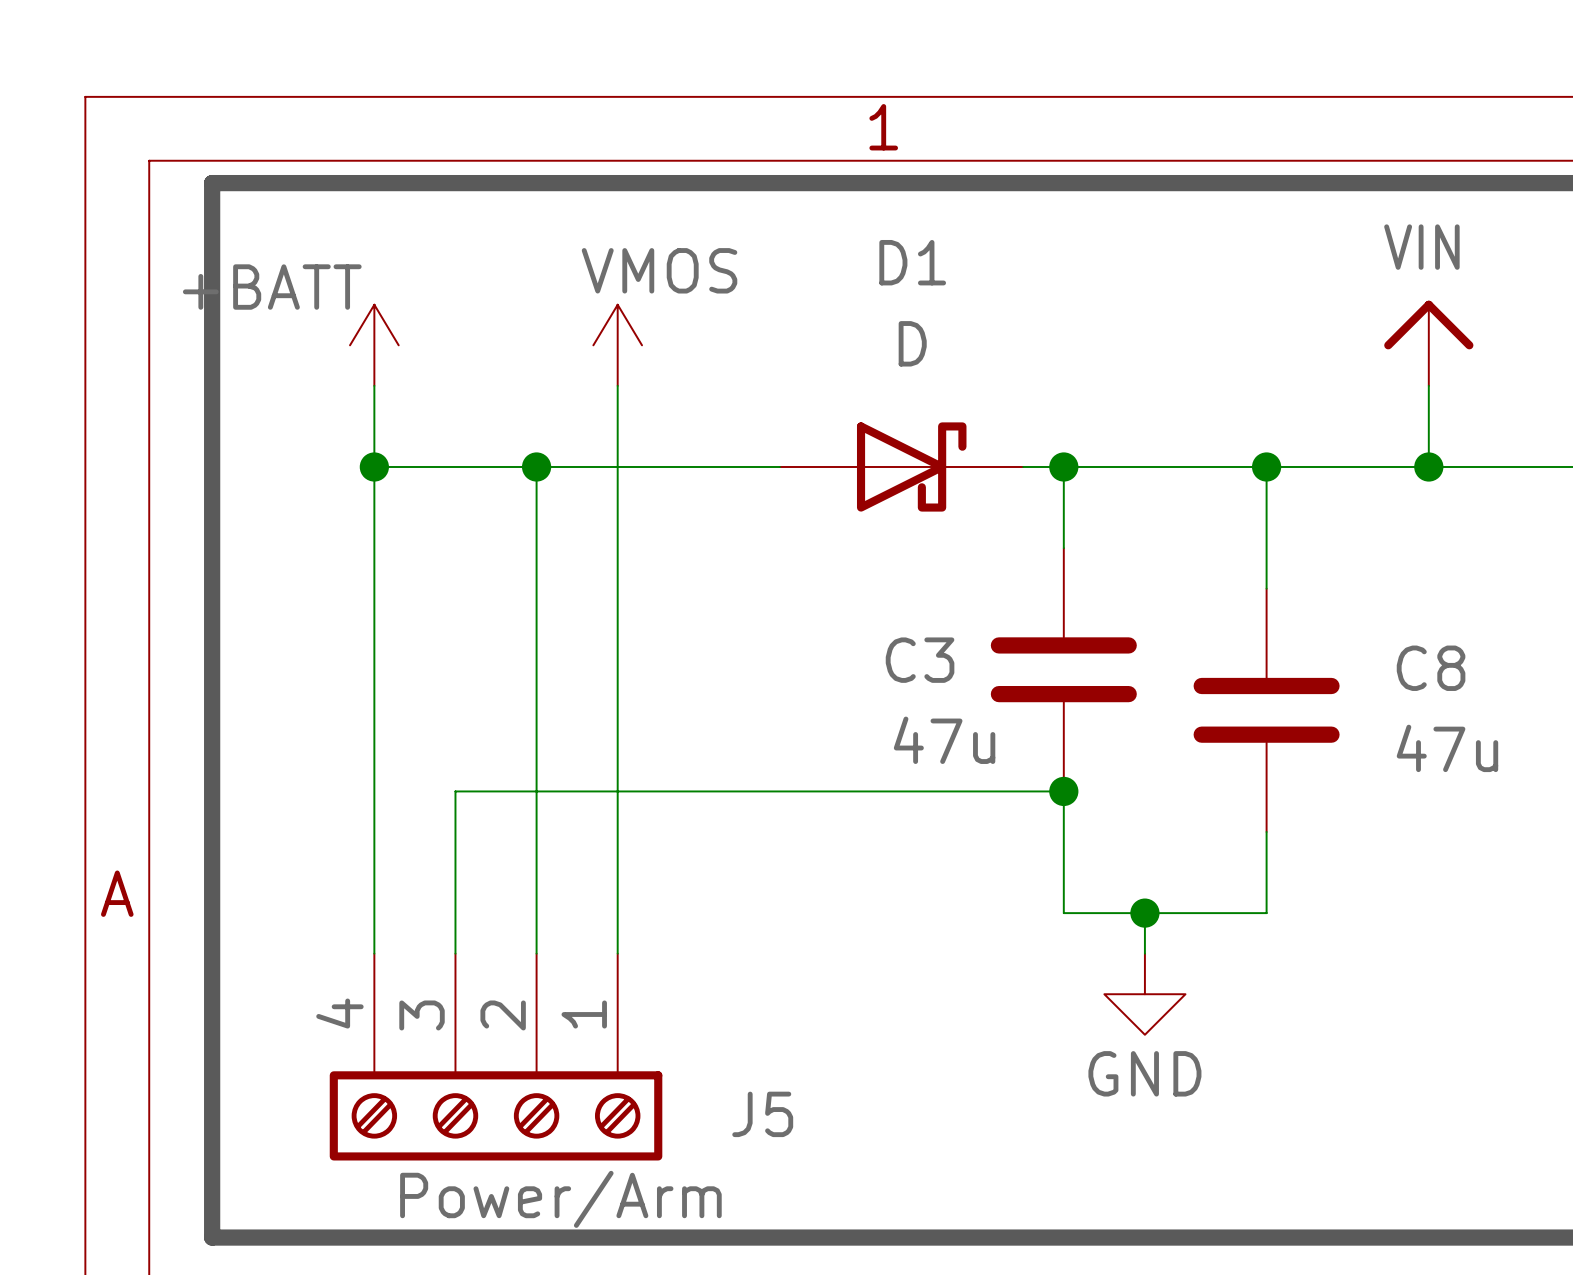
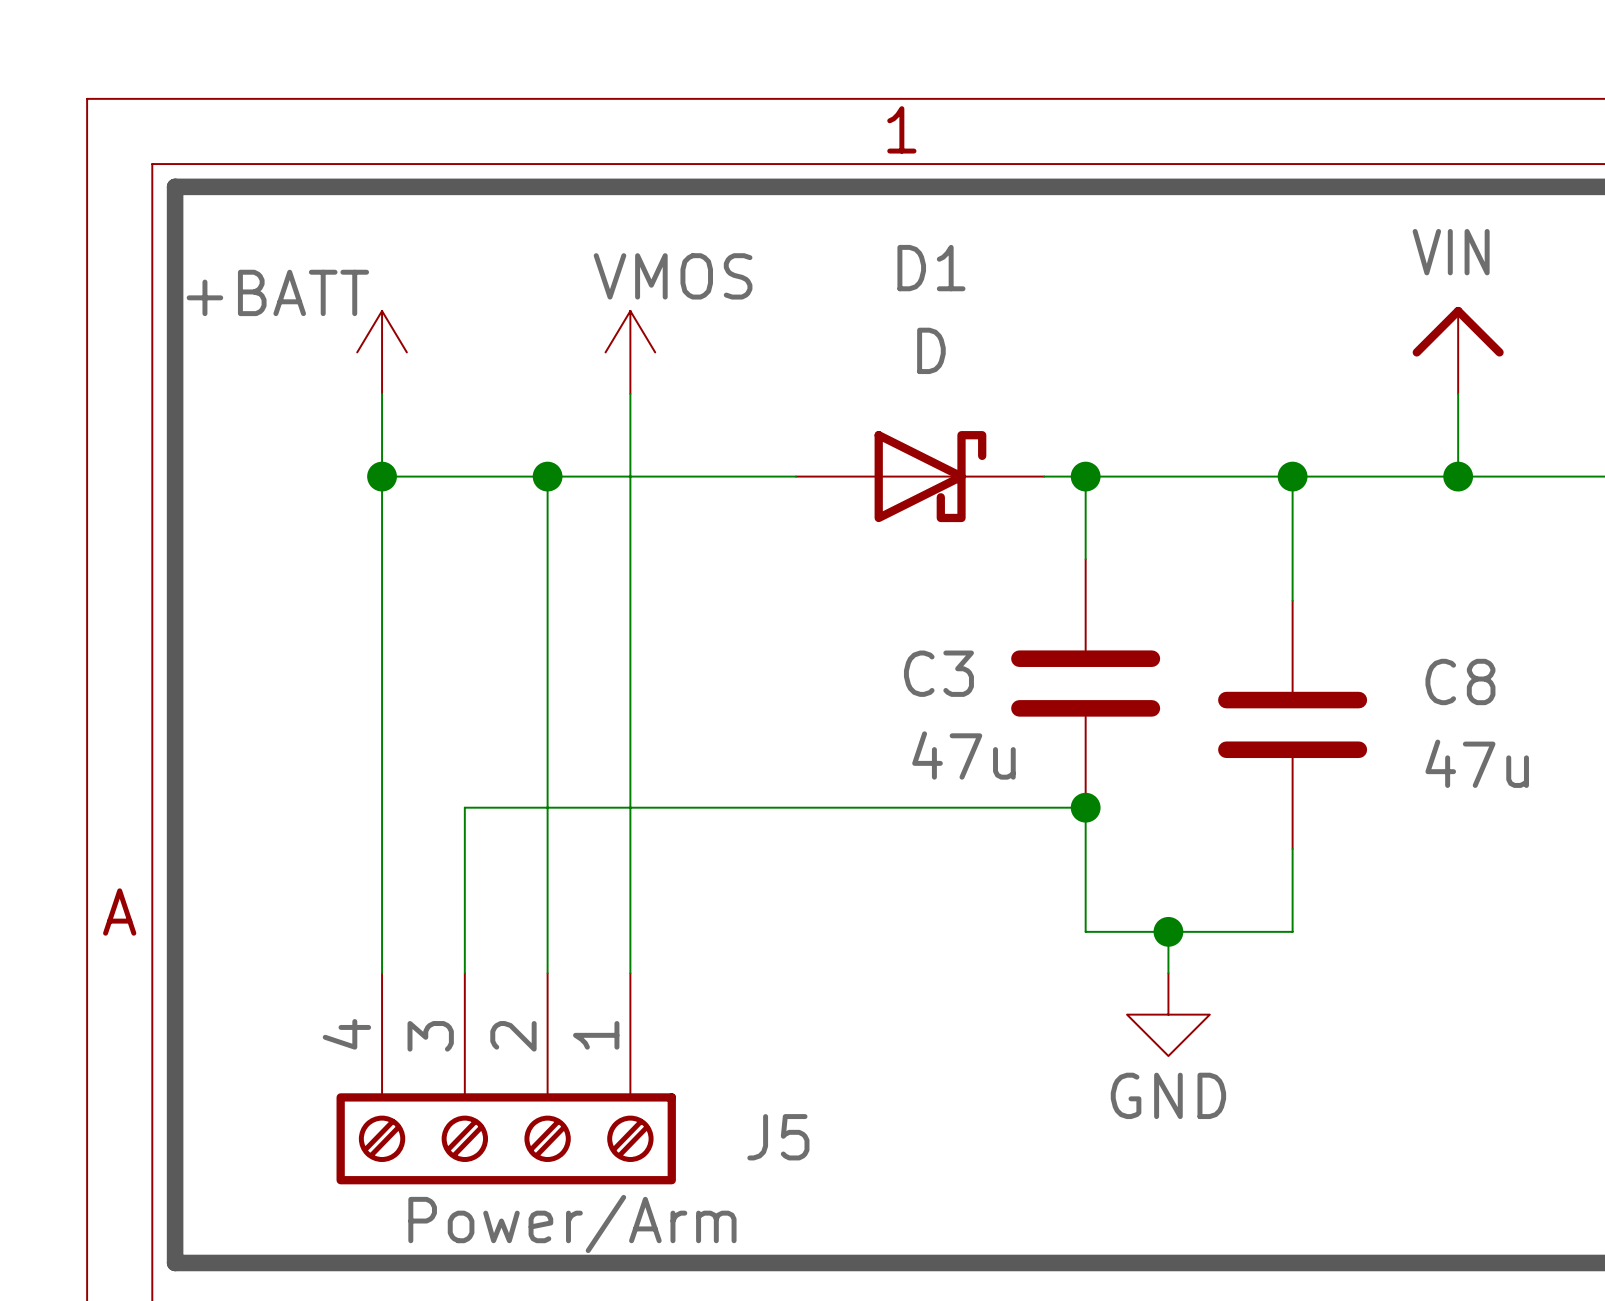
line: (212, 183) (212, 1237) -> (216, 186) (175, 186) (175, 1262) (216, 1262)

